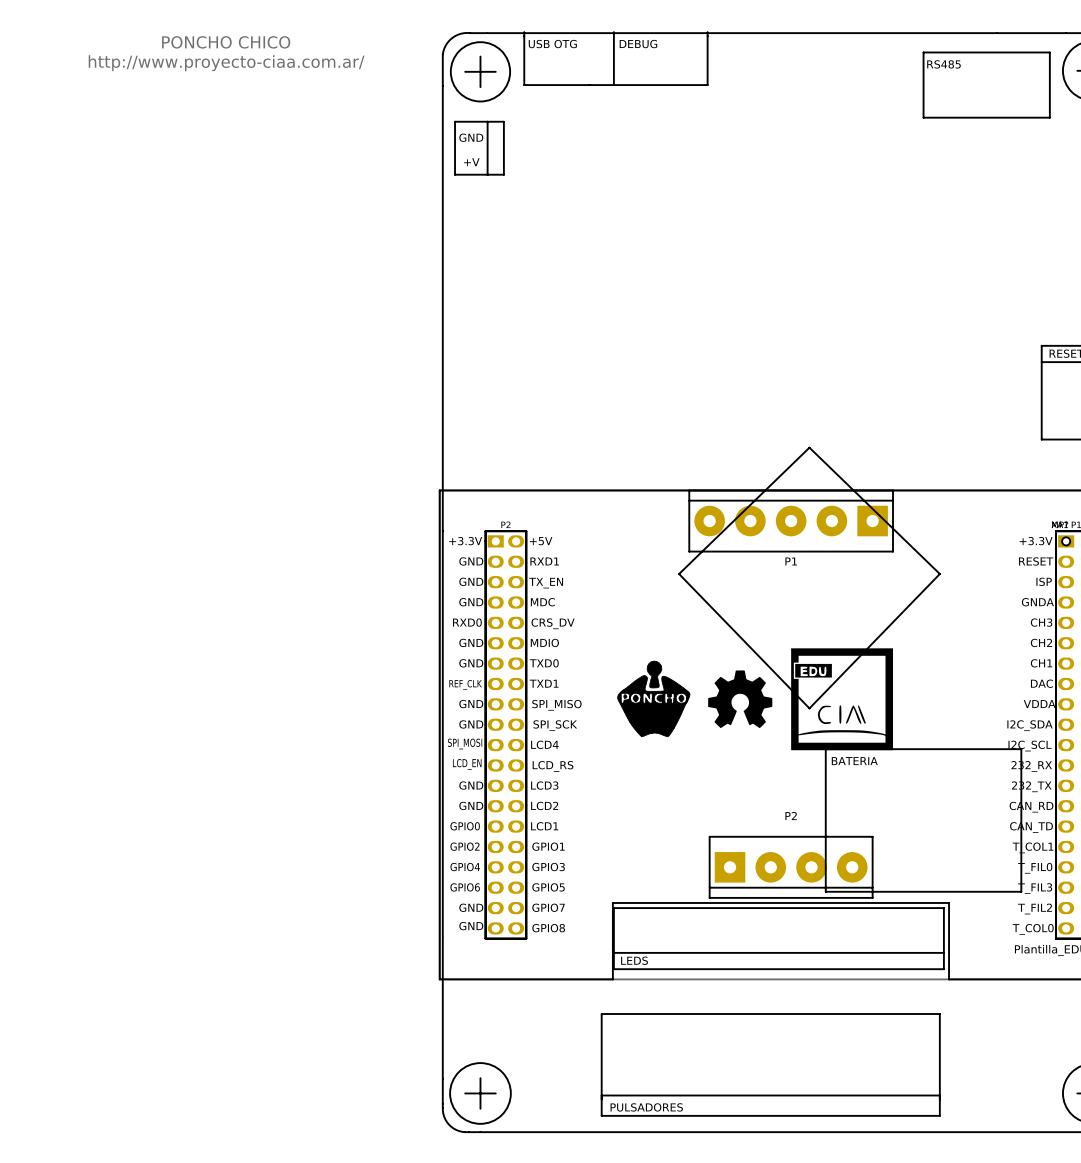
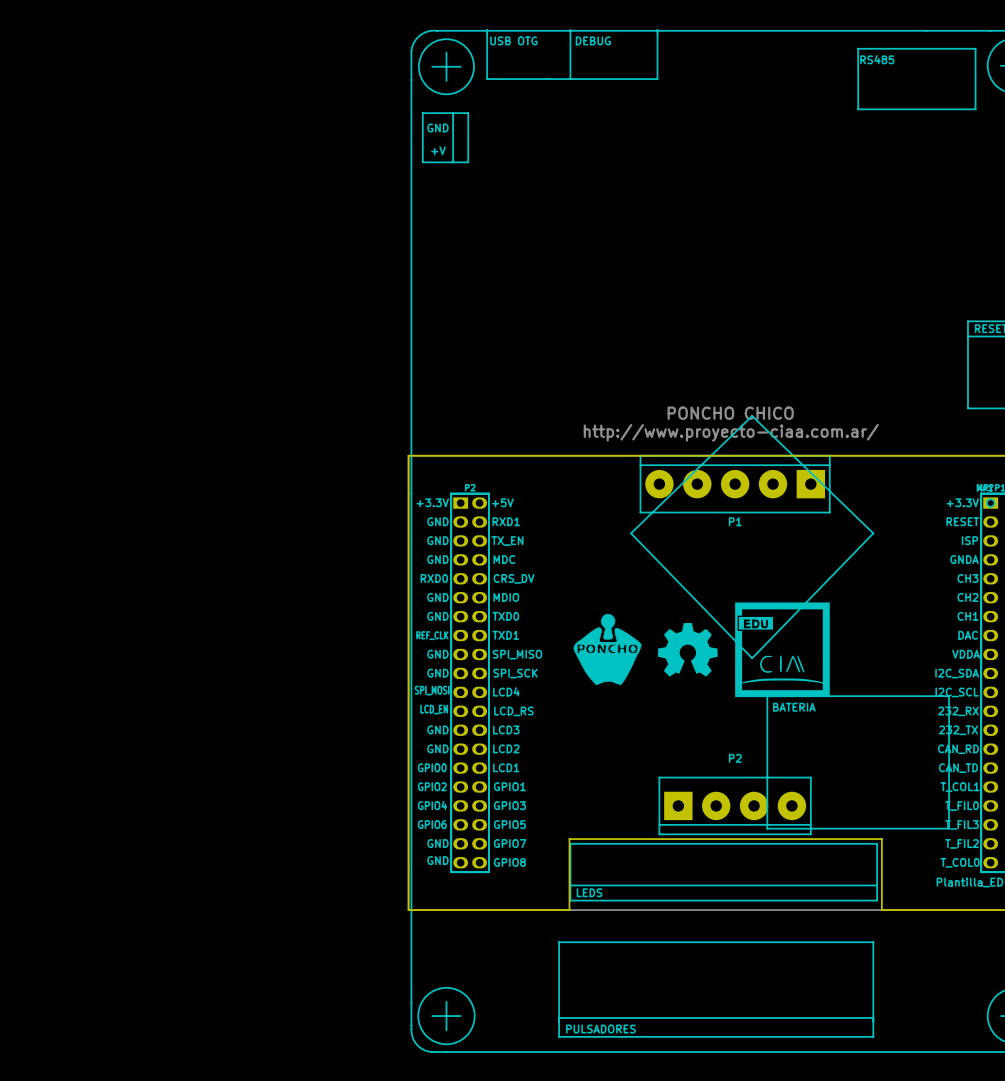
text: PONCHO CHICO (226, 42) -> none
text: http://www.proyecto-ciaa.com.ar/ (226, 63) -> none
text: none -> PONCHO CHICO (730, 413)
text: none -> http://www.proyecto-ciaa.com.ar/ (731, 432)

